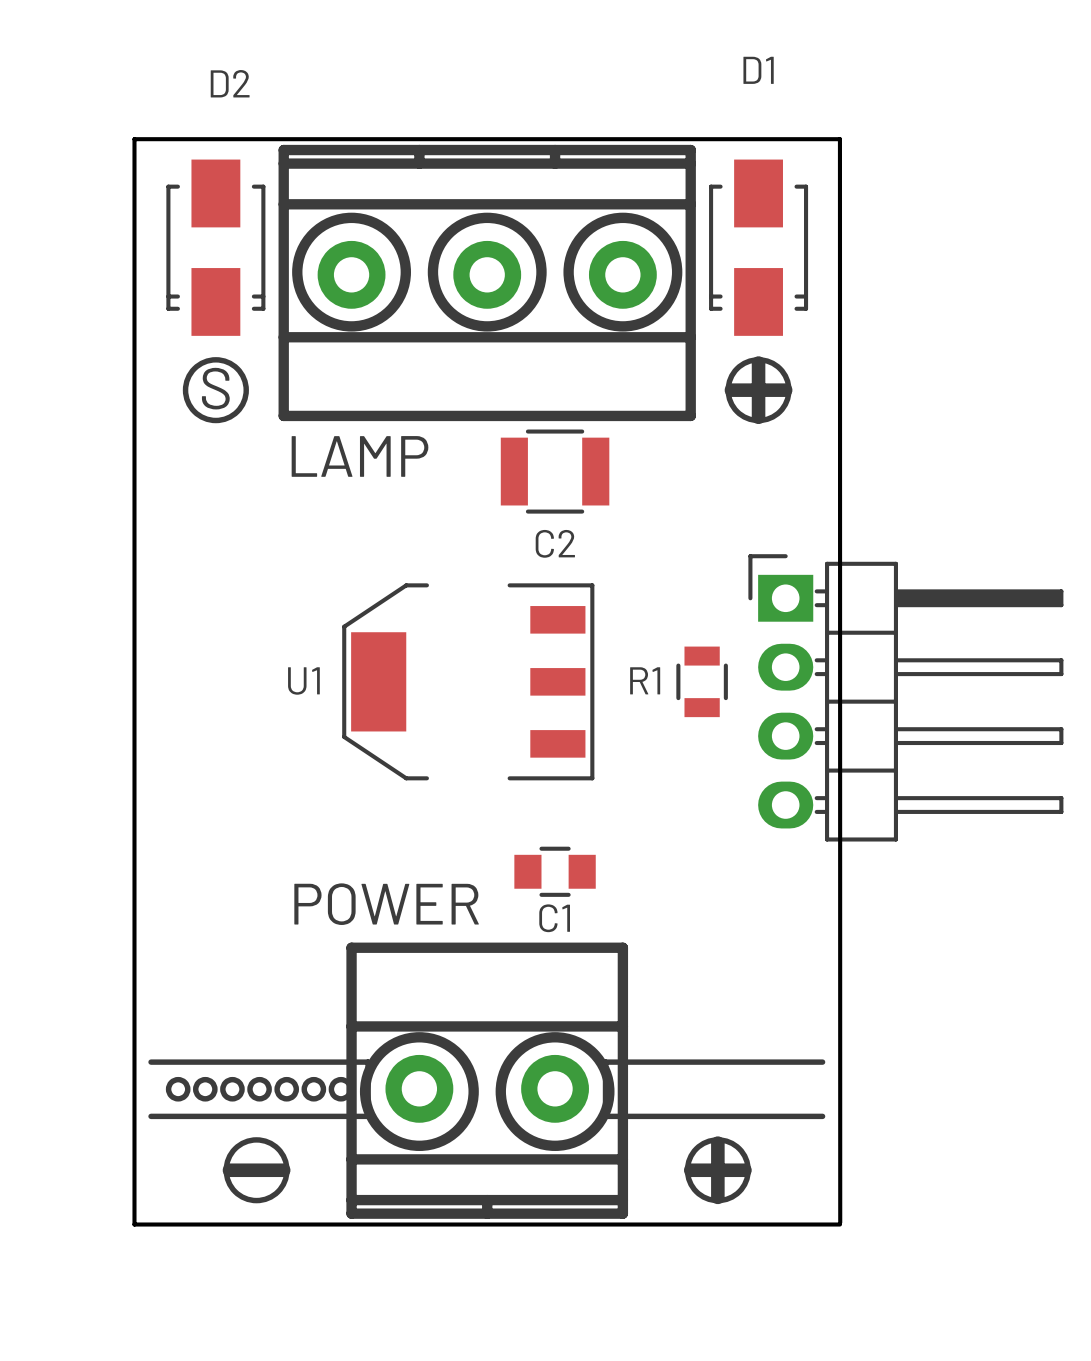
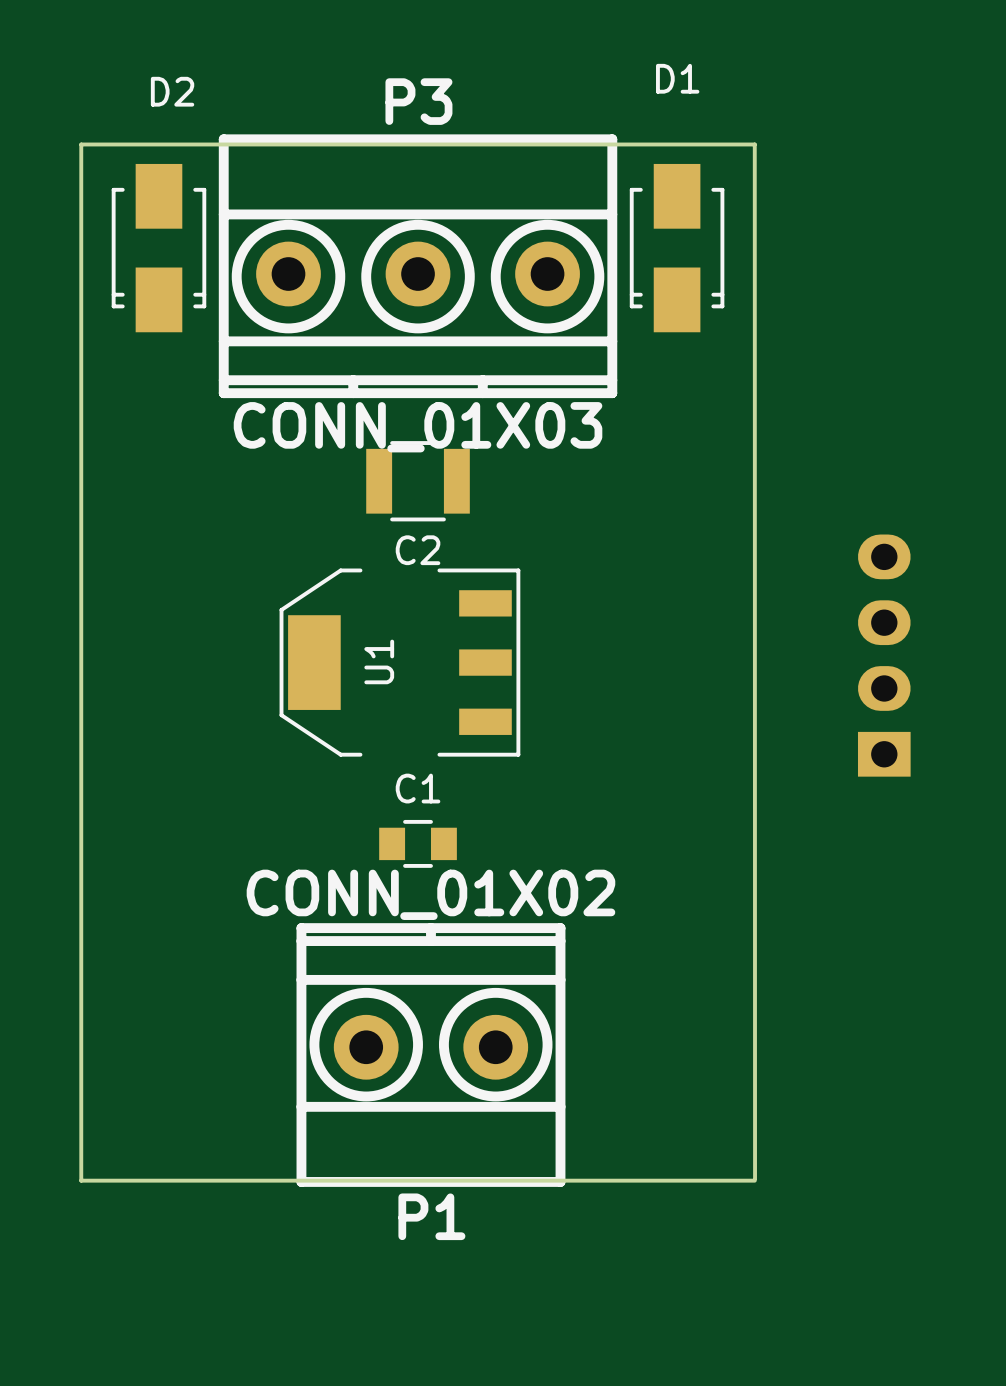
P3: none -> CONN_01X03 (418, 266)
part: LAMP (487, 282) -> none
drawing: [182, 357, 249, 424] -> none
drawing: [725, 357, 792, 424] -> none
line: (758, 363) (758, 417) -> none
text: S (215, 388) -> none
line: (731, 390) (785, 390) -> none
C2 position: (555, 471) -> (418, 481)
U1 name rotation: 0° (303, 680) -> 90° counterclockwise (379, 661)
U1 name position: U1 (303, 680) -> U1 (379, 661)
R1: (702, 681) -> none
part side: top (905, 697) -> bottom (884, 655)
C1 position: (555, 871) -> (418, 843)
C1 name position: C1 (554, 918) -> C1 (418, 788)
line: (151, 1062) (368, 1062) (368, 1116) (151, 1116) -> none
line: (822, 1062) (605, 1062) (605, 1116) (822, 1116) -> none
drawing: [165, 1076, 354, 1102] -> none
part: POWER (487, 1080) -> none
P1: none -> CONN_01X02 (430, 1055)
drawing: [223, 1137, 290, 1204] -> none
drawing: [684, 1137, 751, 1204] -> none
line: (717, 1143) (717, 1197) -> none
line: (229, 1170) (283, 1170) -> none
line: (690, 1170) (744, 1170) -> none

